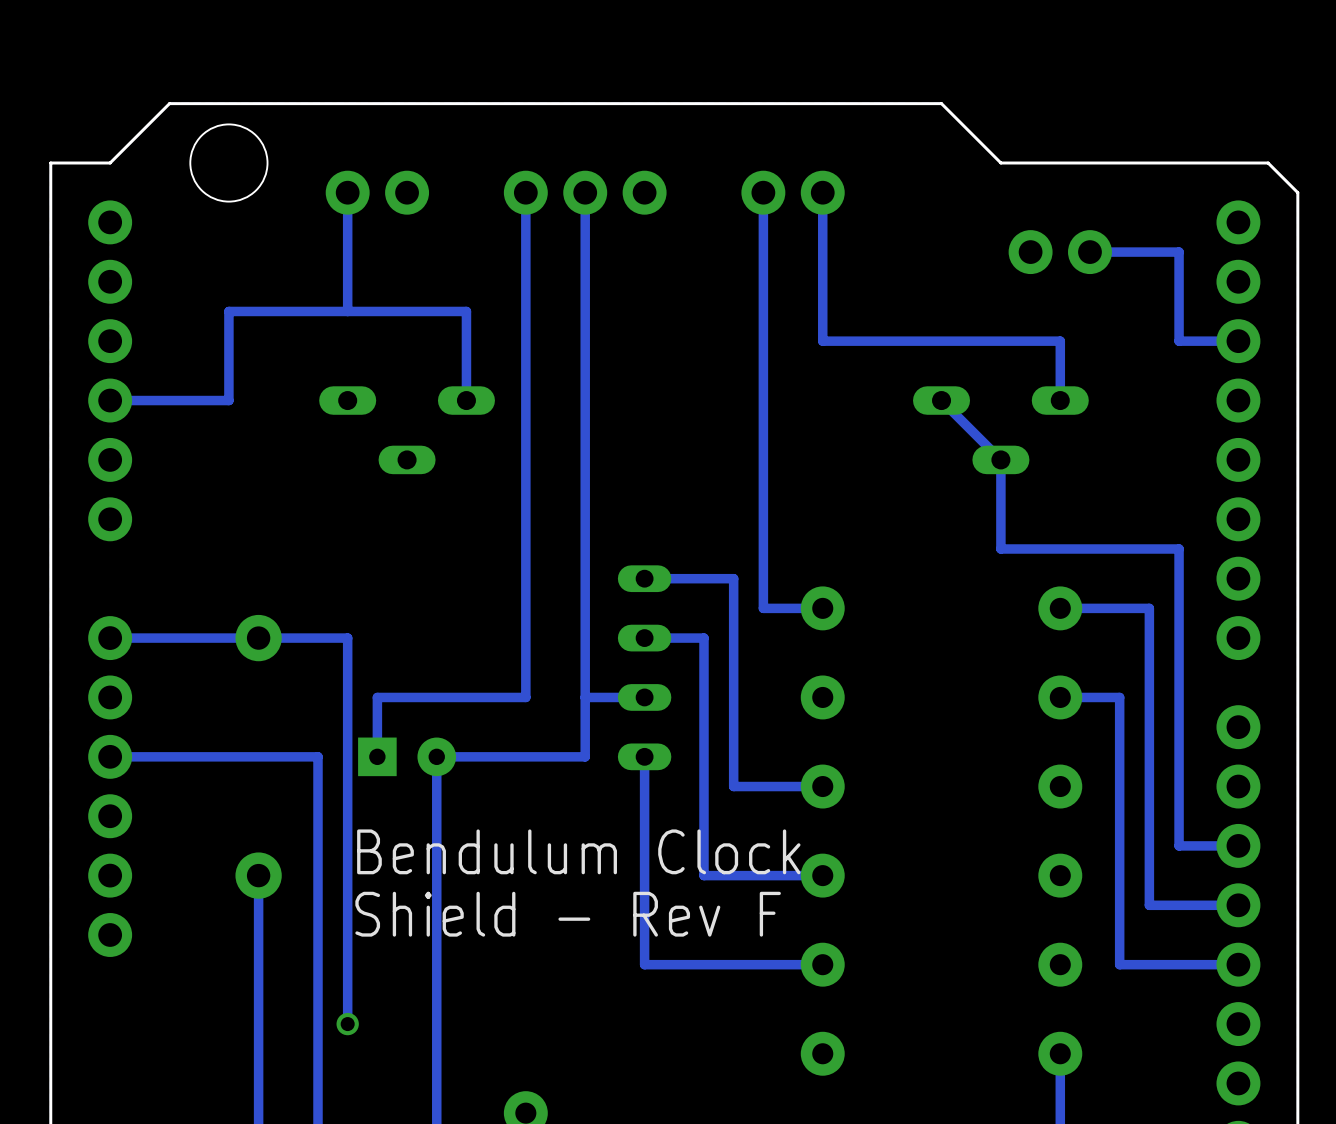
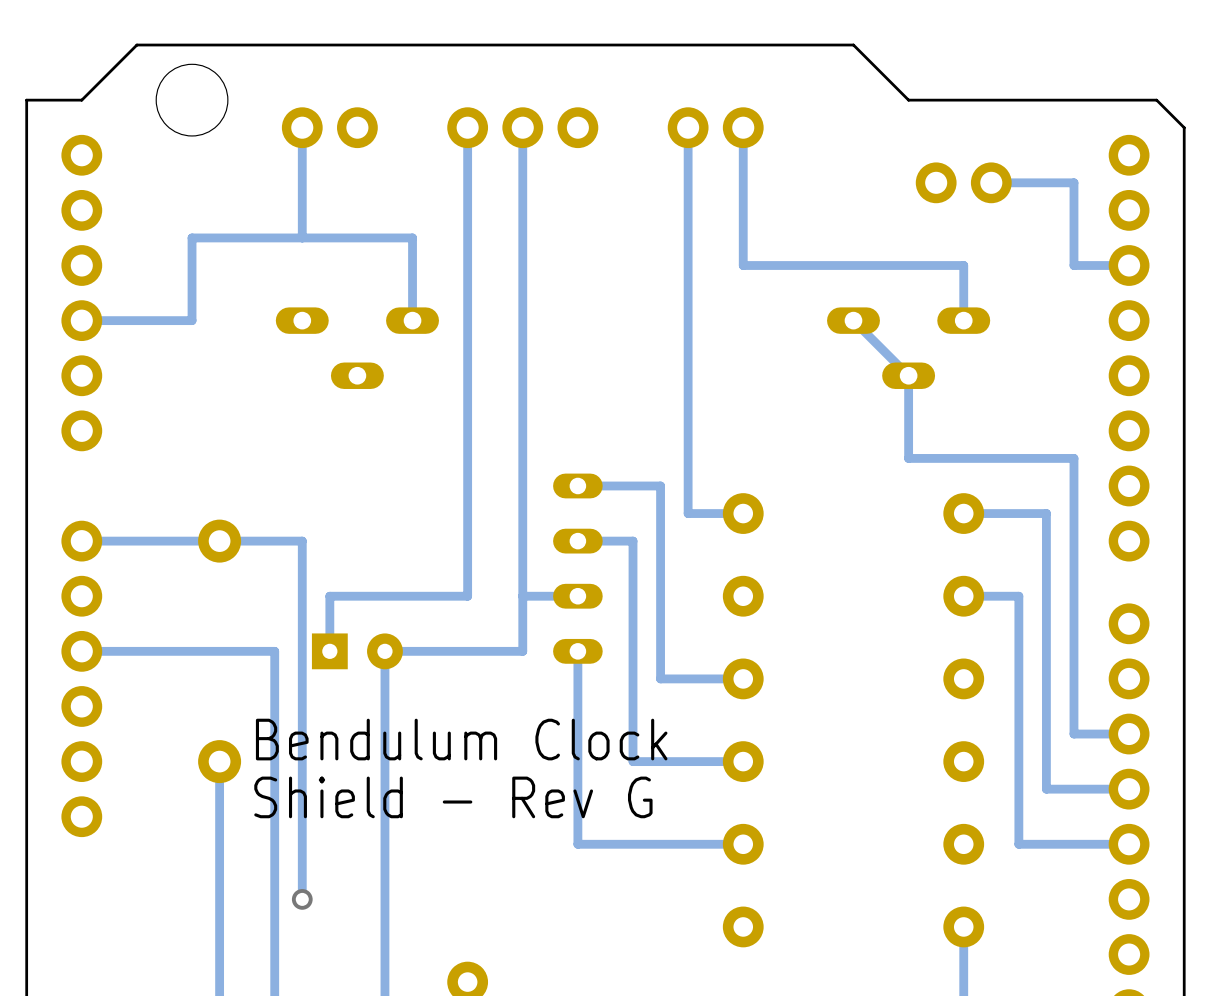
text position: Bendulum Clock (578, 851) -> Bendulum Clock (461, 739)
text: Shield - Rev F (568, 914) -> Shield - Rev G (453, 797)

